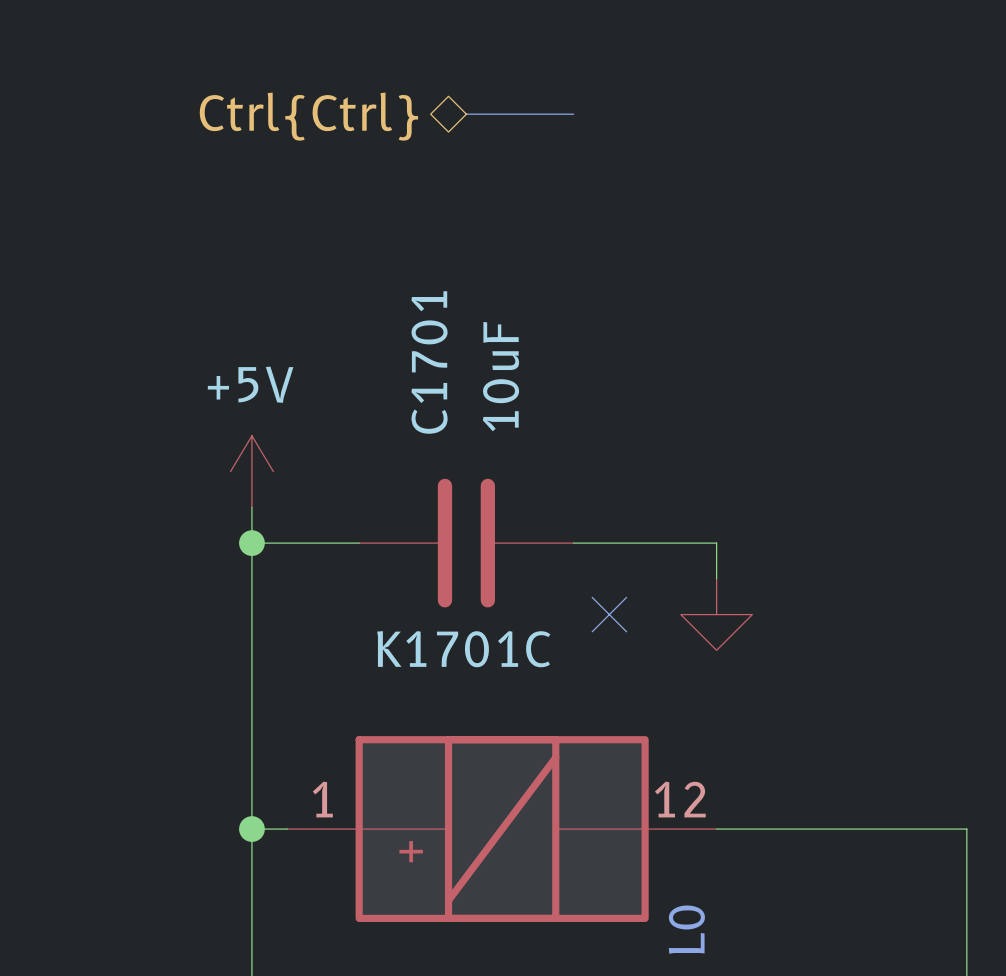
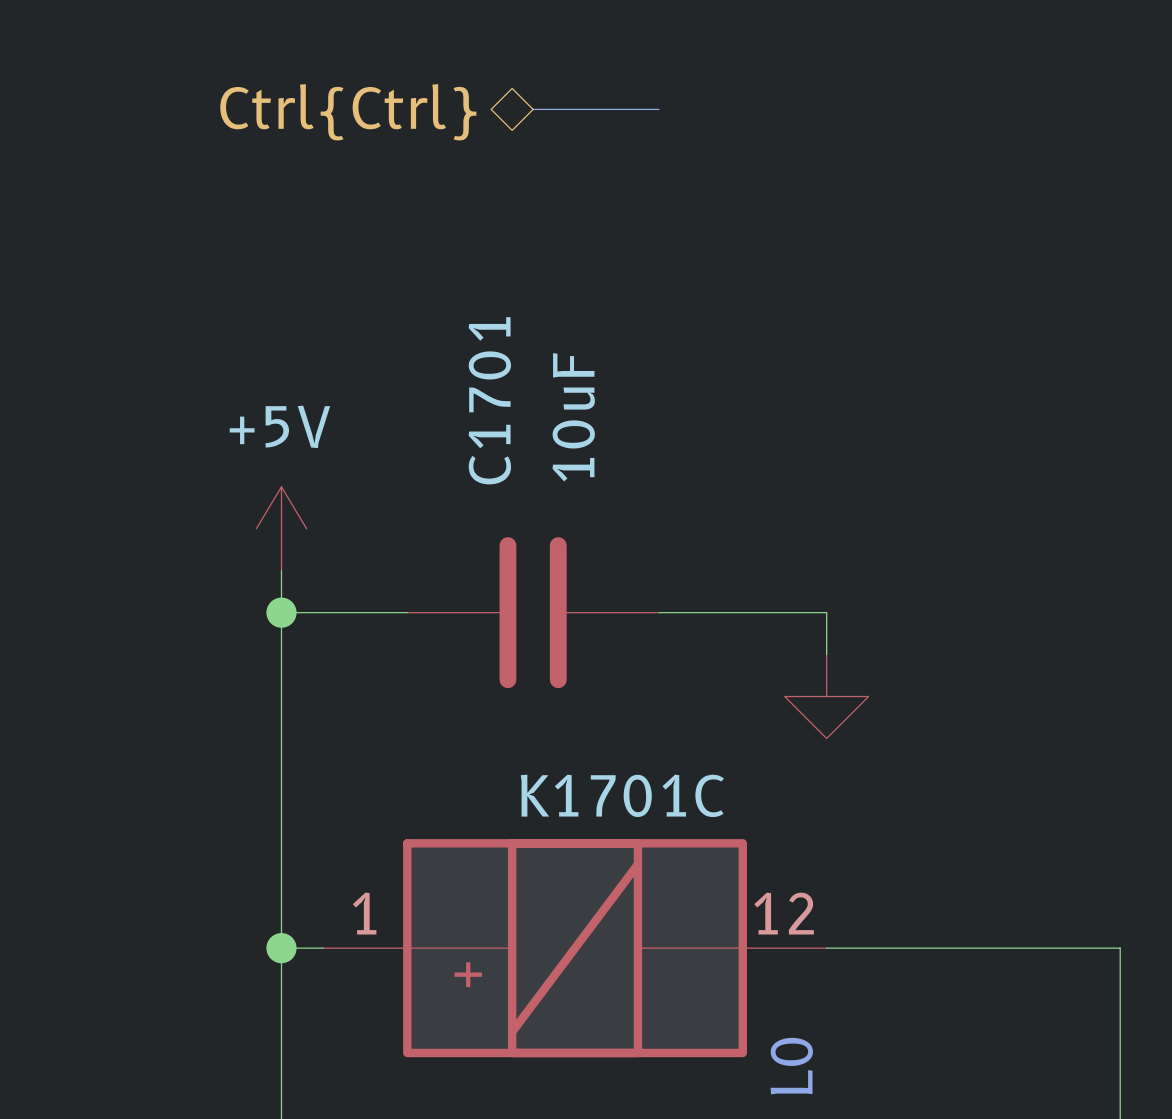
no-connect mark: (609, 614) -> none
K1701C name position: K1701C (463, 649) -> K1701C (622, 795)

